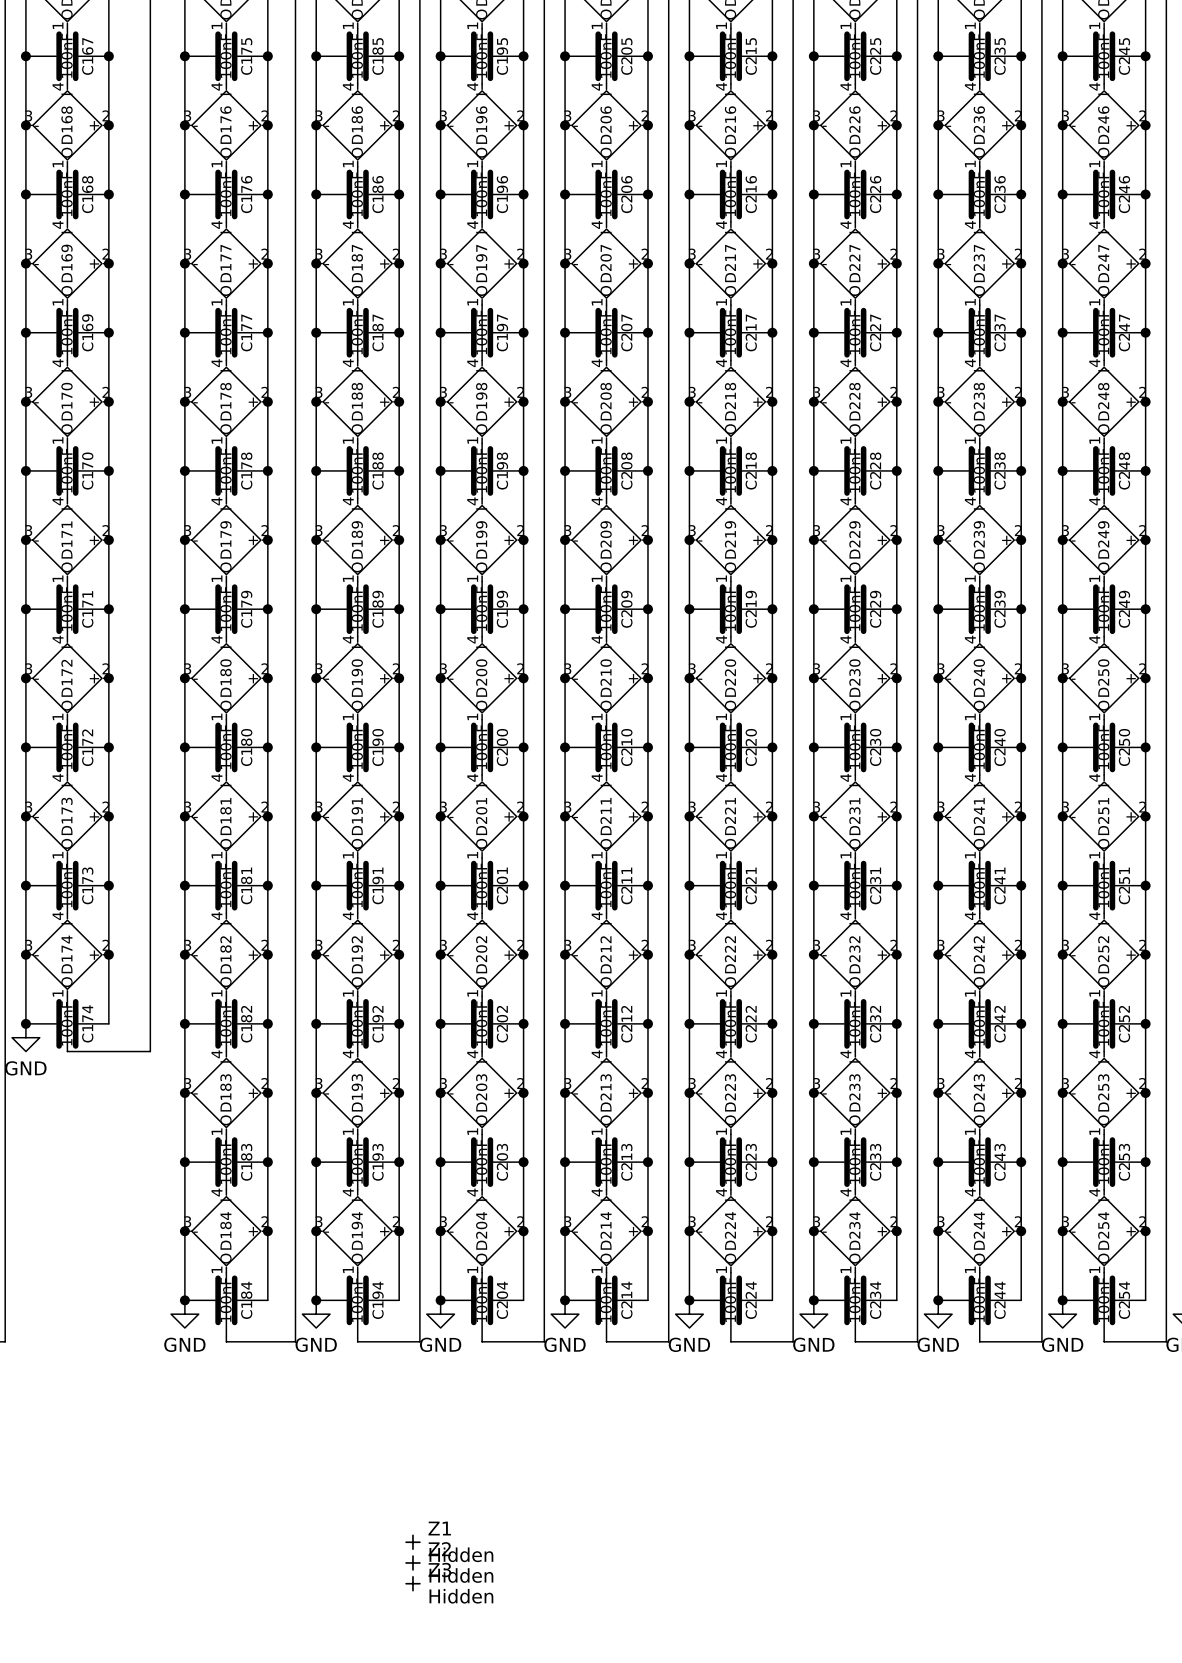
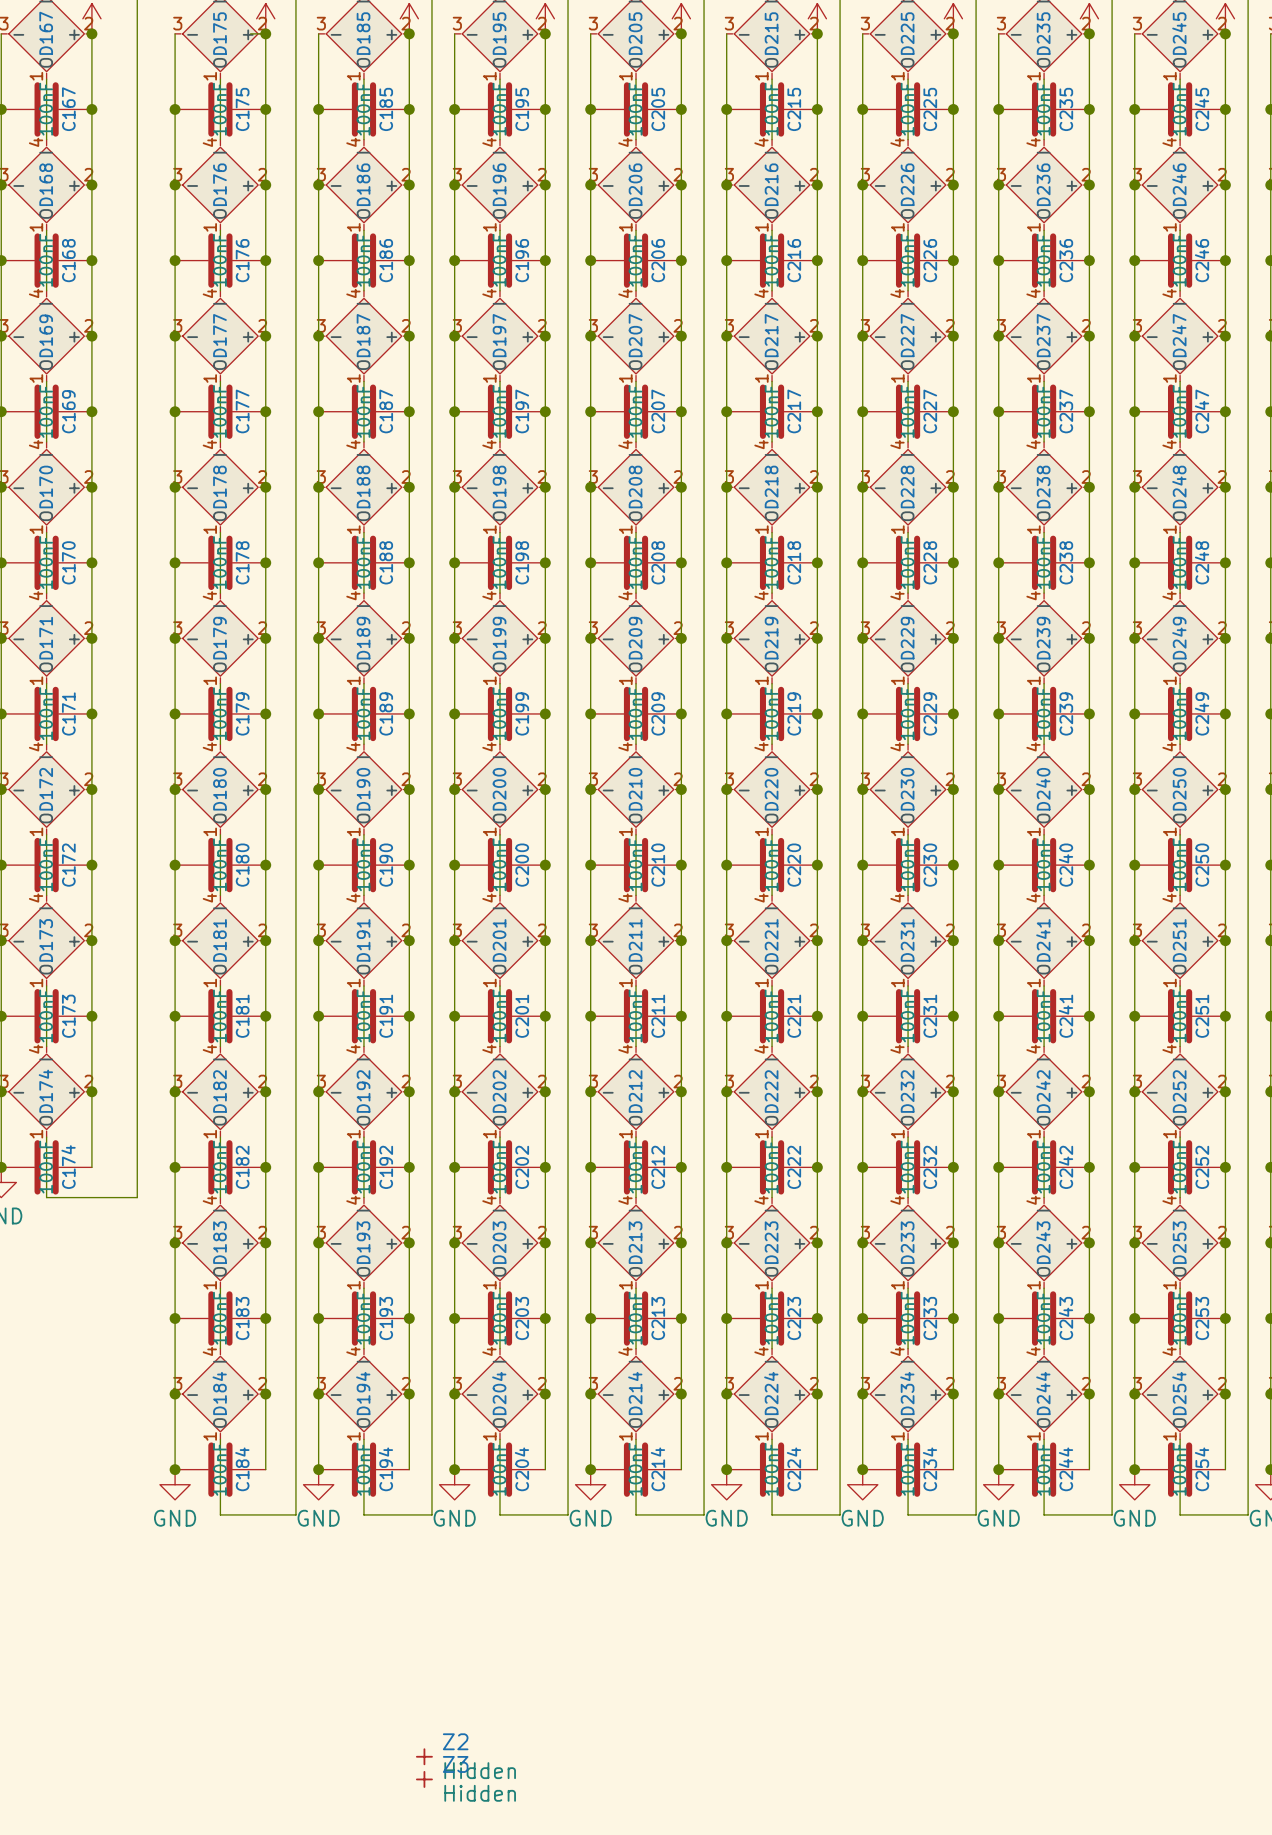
Z1: Hidden (412, 1542) -> none

